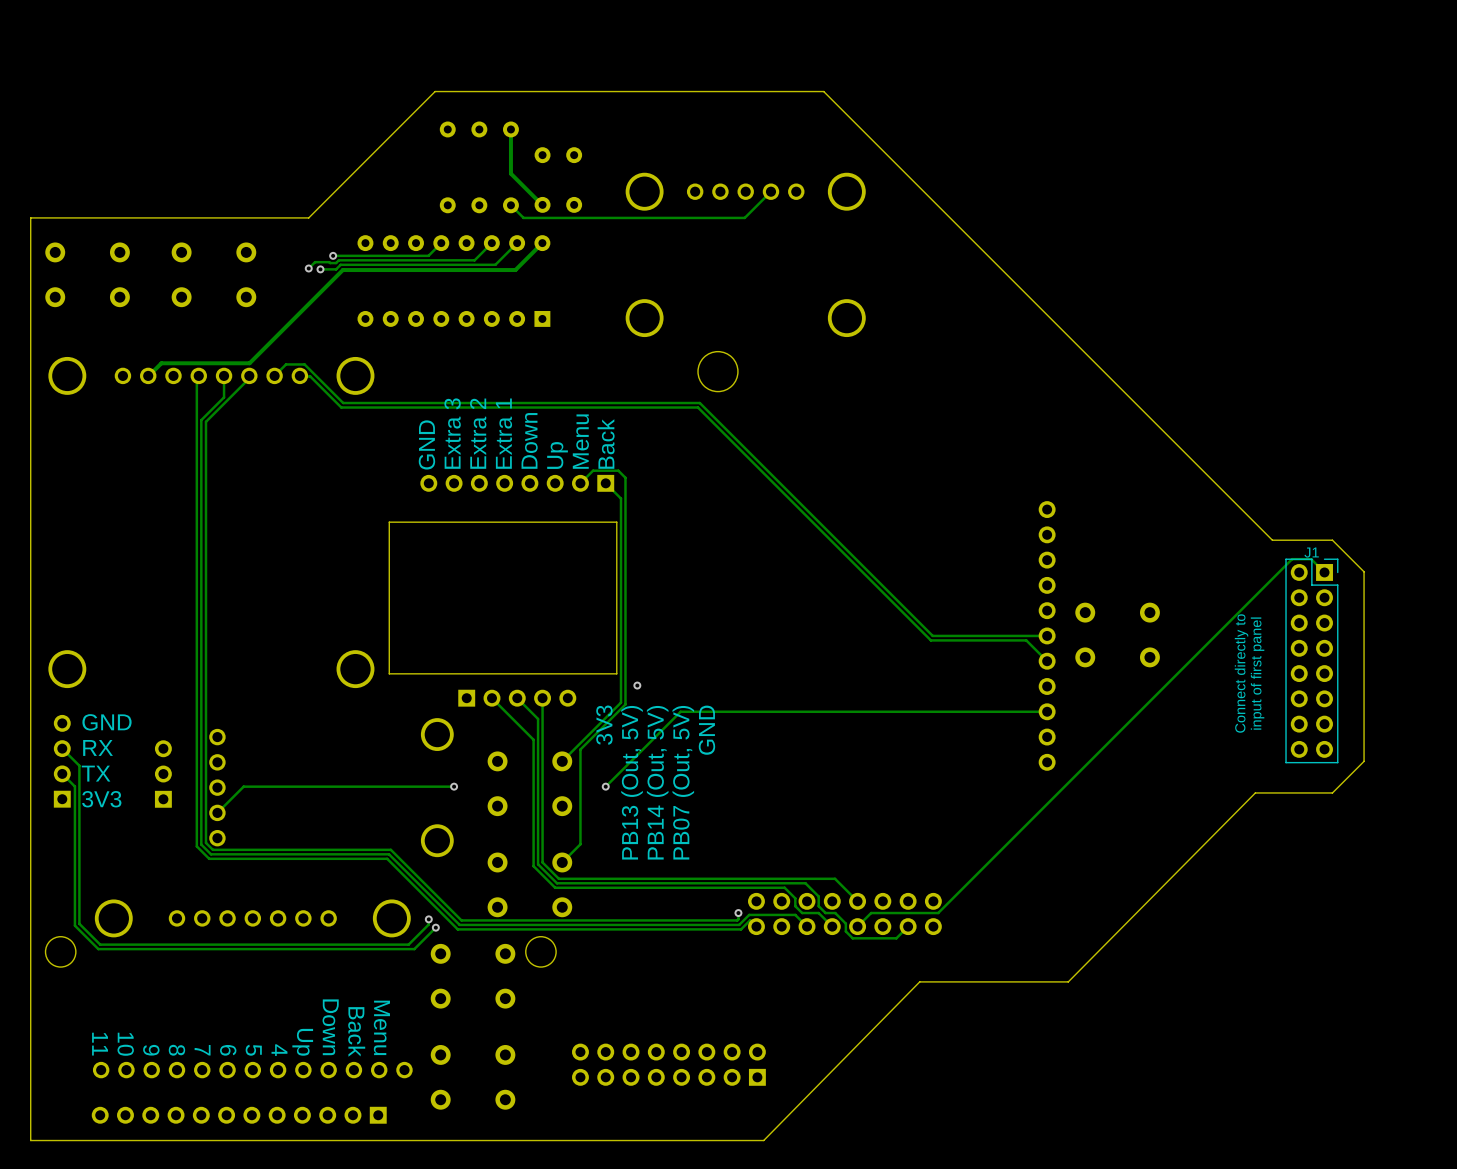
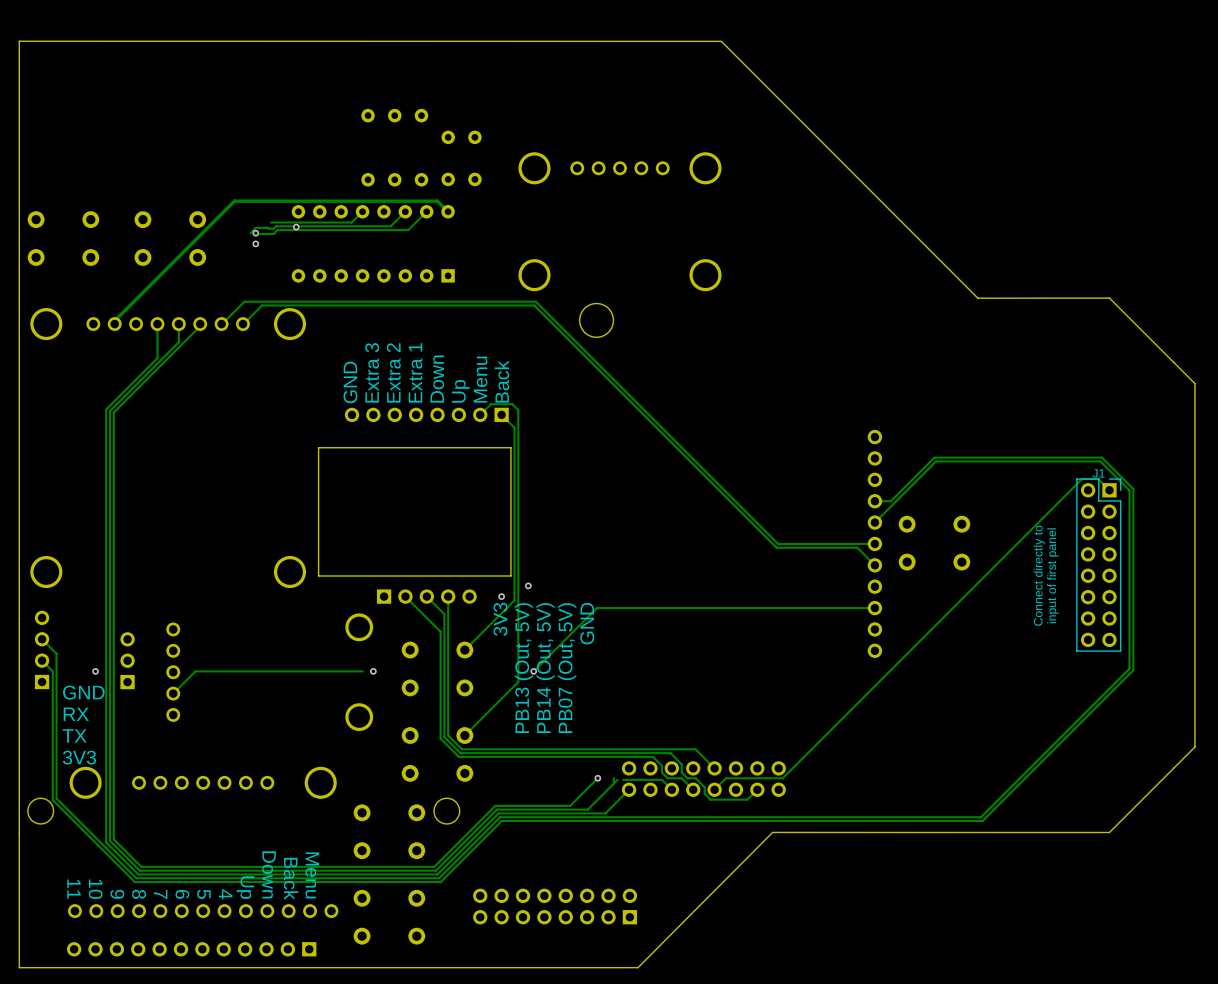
board edge: (823, 91) (1272, 540) (1332, 540) (1364, 571) (1364, 761) (1332, 792) (1255, 792) (1068, 981) (919, 981) (763, 1140) (30, 1140) (30, 217) (308, 217) (435, 91) (823, 91) -> (19, 41) (721, 41) (977, 298) (1109, 298) (1194, 383) (1194, 746) (1109, 832) (772, 832) (638, 967) (19, 967) (19, 41)
track: (510, 129) (510, 173) (542, 205) -> none
track: (770, 191) (744, 217) (523, 217) (510, 205) -> none
track: (542, 243) (515, 270) (342, 270) (249, 363) (161, 363) (148, 376) -> (448, 211) (437, 201) (234, 201) (114, 320) (114, 324)
via: (333, 255) -> none
via: none -> (296, 227)
via: (308, 268) -> none
via: none -> (255, 233)
via: (320, 269) -> none
via: none -> (255, 243)
track: (274, 375) (286, 364) (304, 364) (343, 403) (699, 403) -> (221, 324) (244, 301) (535, 301) (581, 346)
track: (198, 376) (196, 378) (196, 846) (209, 858) (387, 858) (457, 929) (741, 929) (750, 920) (756, 926) -> (157, 324) (157, 358) (106, 409) (106, 842) (138, 874) (437, 874) (498, 813) (605, 813) (629, 789)
track: (299, 376) (310, 376) (341, 407) (697, 407) -> (242, 324) (262, 305) (534, 305) (579, 350)
track: (201, 420) (201, 844) (211, 854) (389, 854) (459, 924) (739, 924) (749, 914) -> none
track: (205, 421) (205, 842) (212, 849) (390, 849) (461, 920) (737, 920) -> (159, 361) (109, 411) (109, 840) (139, 870) (435, 870) (496, 809) (587, 809) (612, 784)
track: none -> (163, 362) (113, 412) (113, 839) (141, 866) (434, 866) (495, 805) (570, 805) (597, 778)
via: none -> (501, 596)
track: (625, 704) (580, 749) (580, 844) -> (518, 601) (518, 682) (480, 720)
track: (718, 711) (680, 711) (605, 786) -> (597, 608) (533, 671)
text position: GND (107, 722) -> GND (83, 692)
text position: RX (98, 747) -> RX (76, 714)
text position: TX (96, 773) -> TX (74, 735)
via: none -> (95, 671)
track: (454, 786) (441, 786) -> none
via position: (605, 786) -> (533, 671)
text position: 3V3 (101, 799) -> 3V3 (79, 757)
via position: (738, 913) -> (597, 778)
track: (428, 919) (428, 924) (408, 944) (100, 944) (79, 923) -> (874, 522) (936, 461) (1100, 461) (1129, 490) (1129, 668) (981, 817) (500, 817) (439, 878) (136, 878) (56, 798) (56, 787)
via: (428, 919) -> none
track: (74, 925) (98, 949) (414, 949) (435, 927) -> (52, 788) (52, 800) (134, 882) (440, 882) (501, 821) (982, 821) (1133, 670) (1133, 488) (1101, 457) (934, 457) (890, 501) (874, 501)
via: (435, 927) -> none

